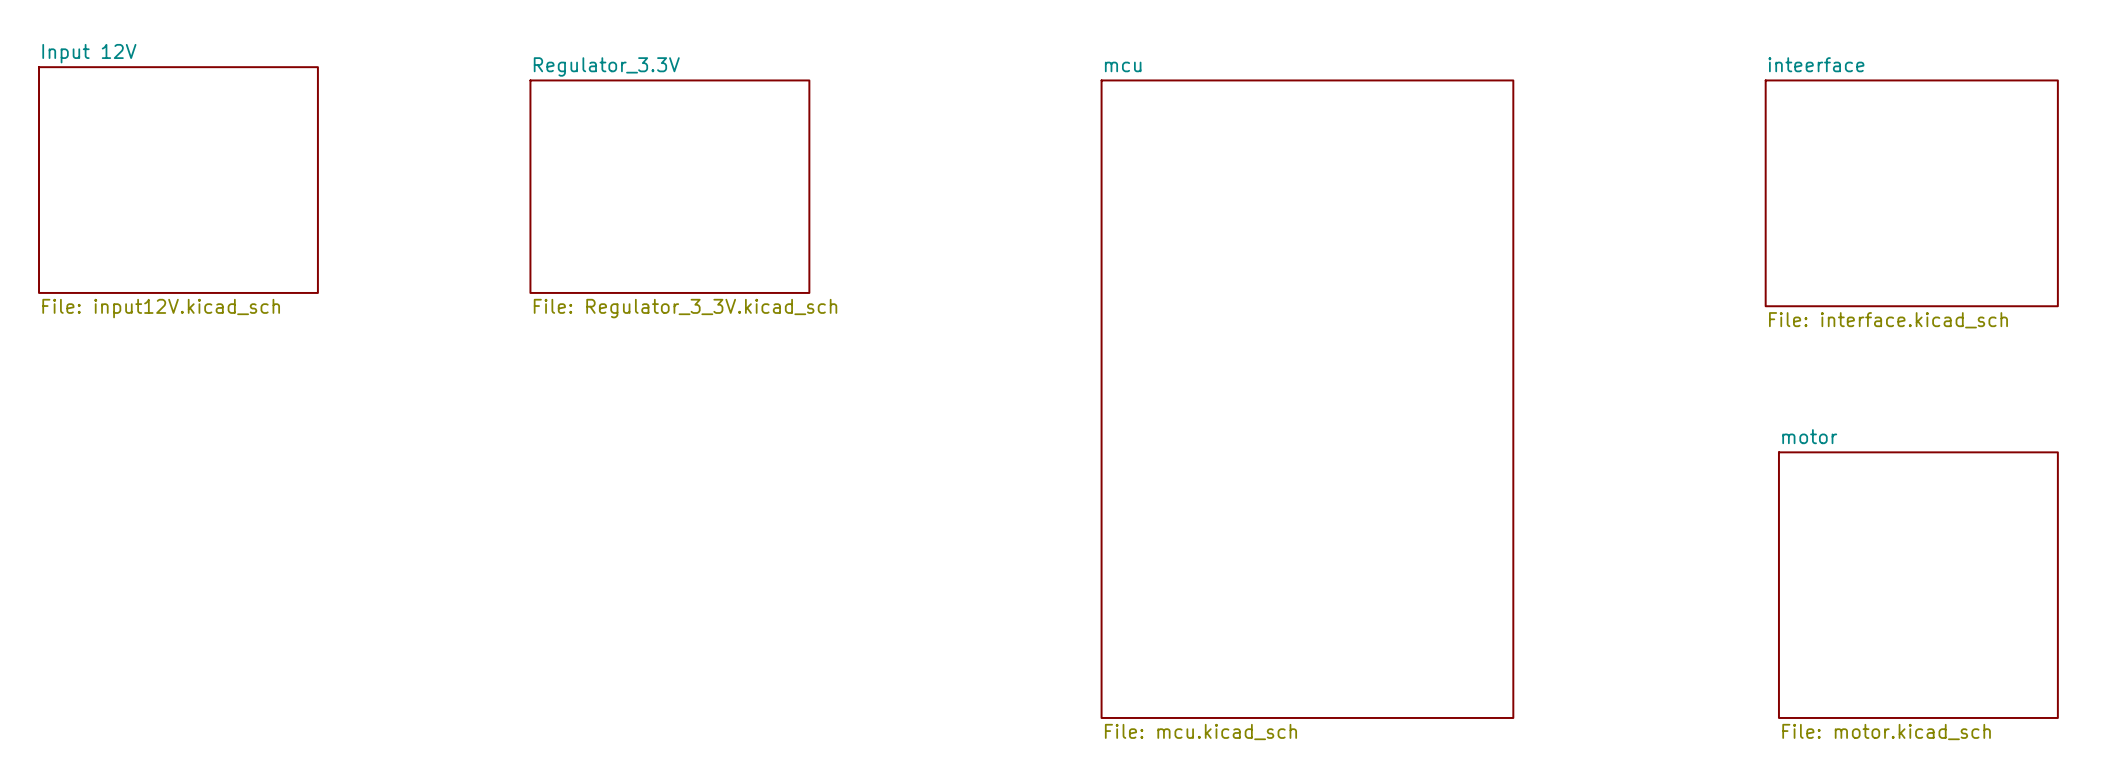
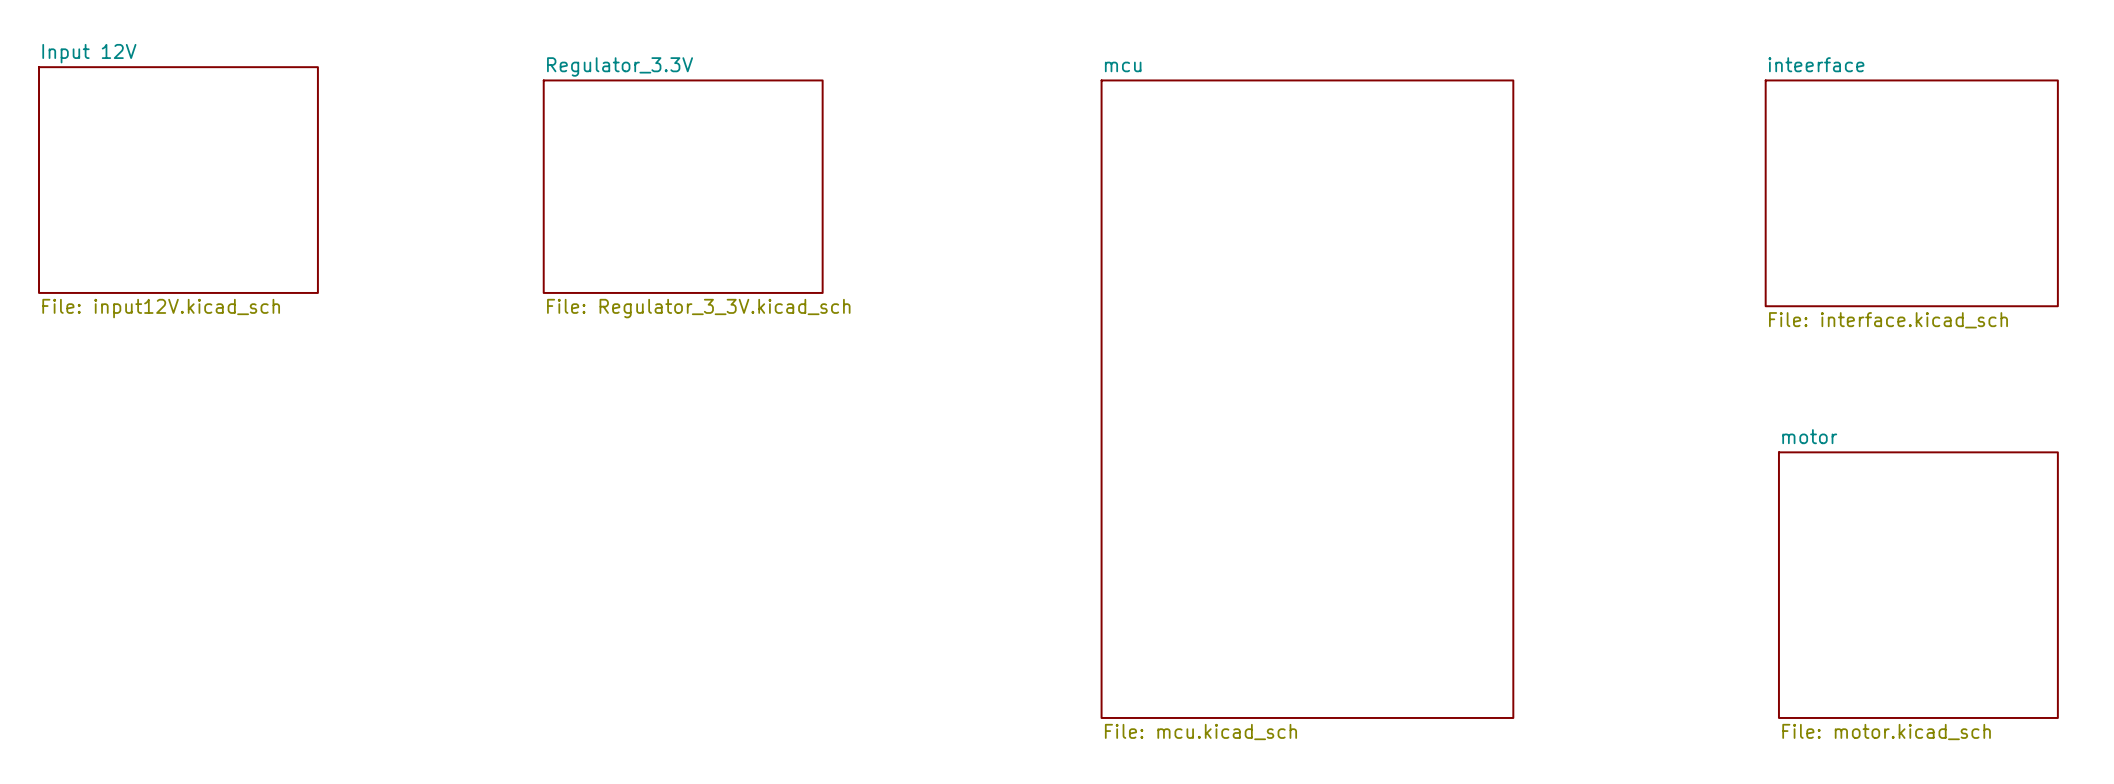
sheet Regulator_3.3V position: (669, 186) -> (683, 186)

